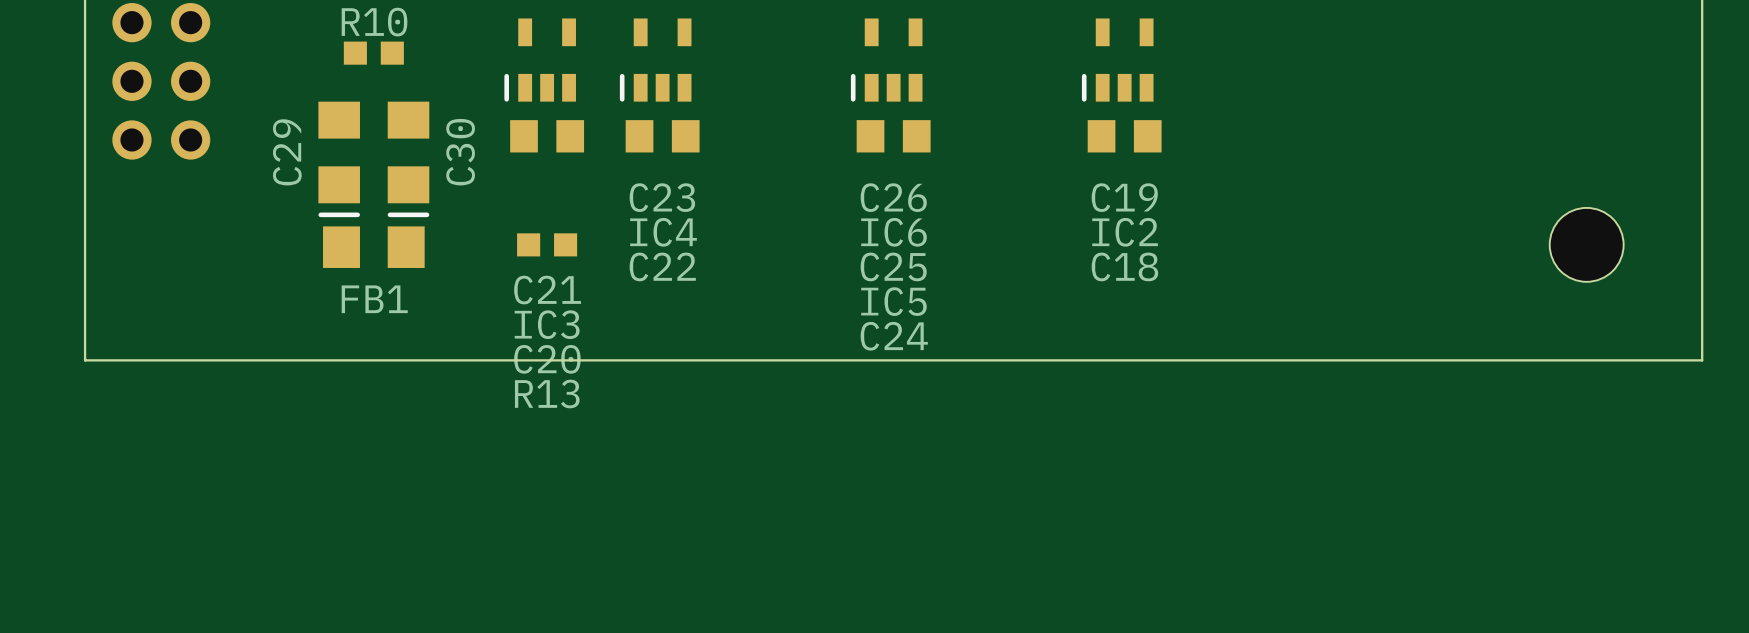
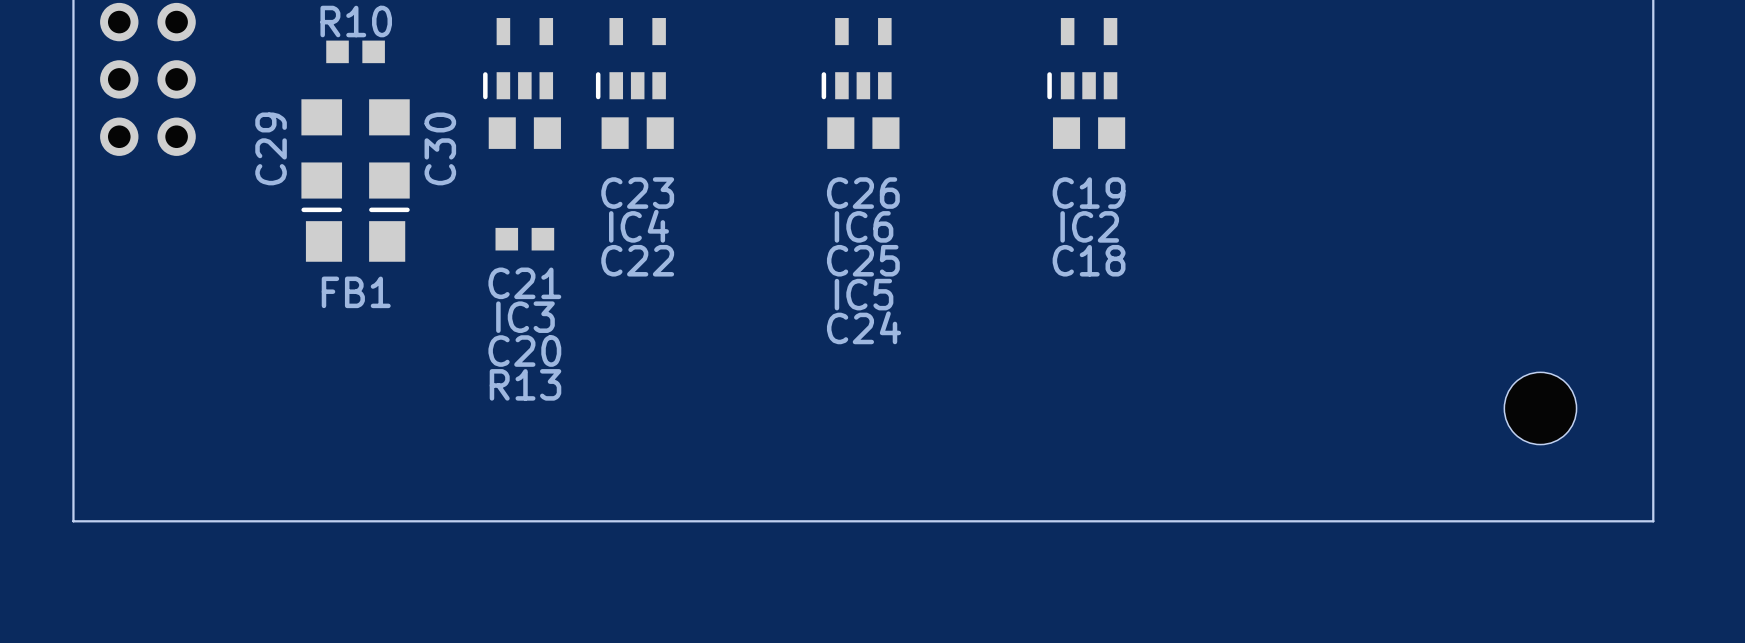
part position: (1586, 244) -> (1540, 408)
board edge: (85, 360) (1702, 360) -> (73, 352) (73, 521) (1653, 521) (1653, 352)

